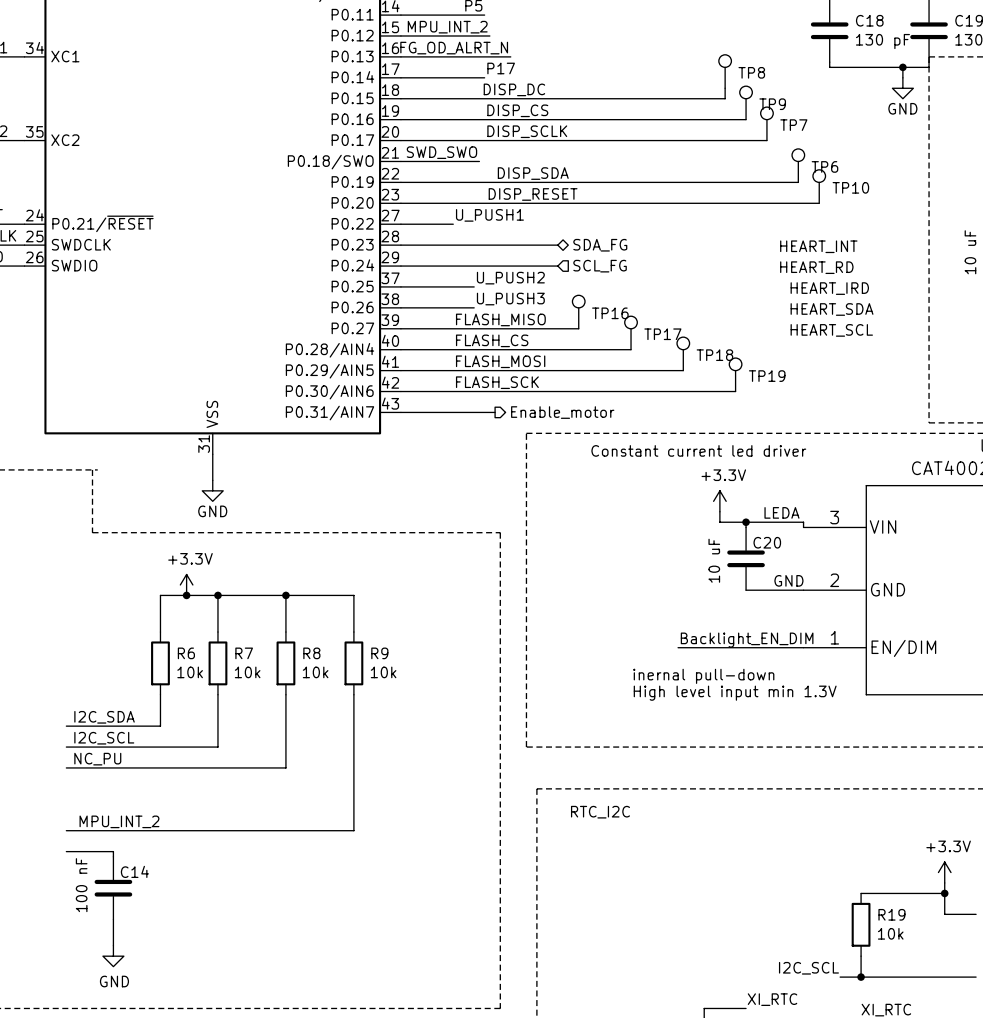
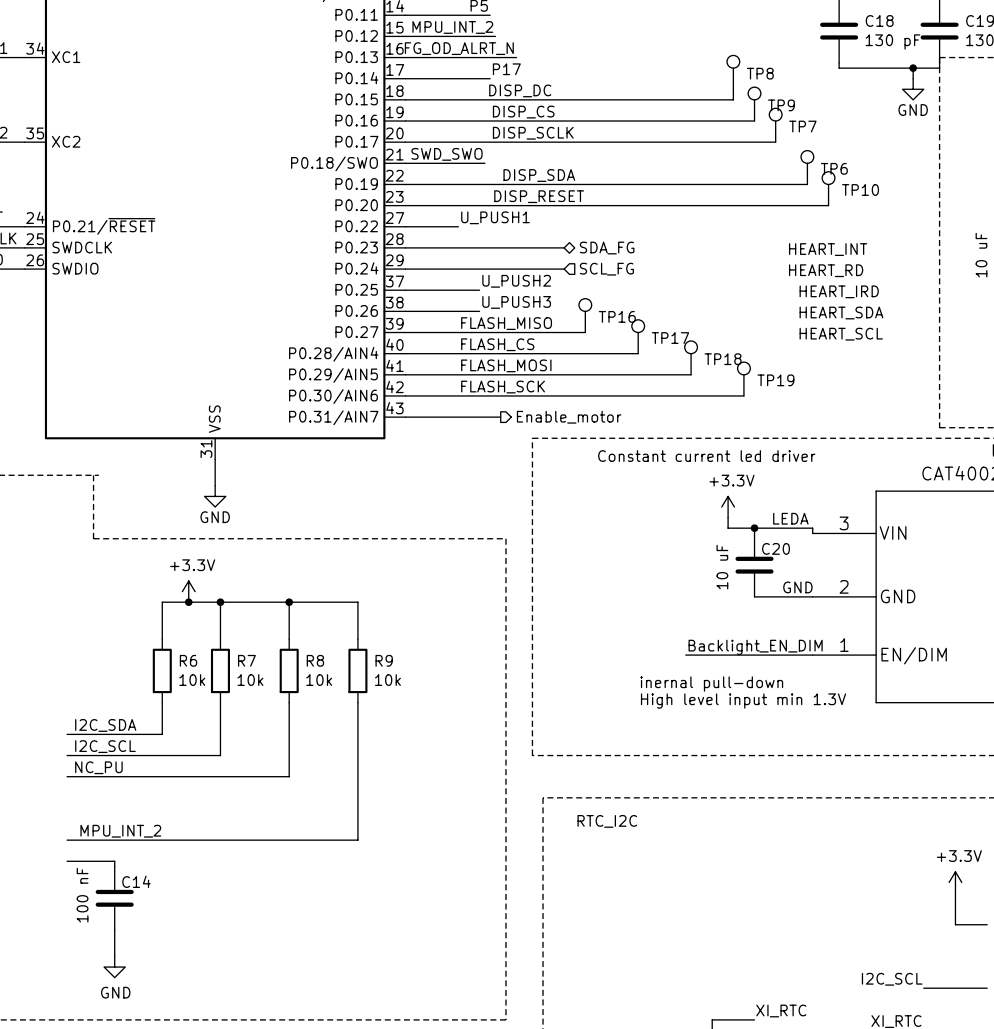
wire: (861, 893) (944, 893) -> none
junction: (944, 893) -> none
R19: 10k (861, 924) -> none
wire: (861, 956) (861, 977) -> none
label position: I2C_SCL (808, 968) -> I2C_SCL (892, 979)
wire: (840, 977) (913, 977) -> none
junction: (861, 977) -> none

